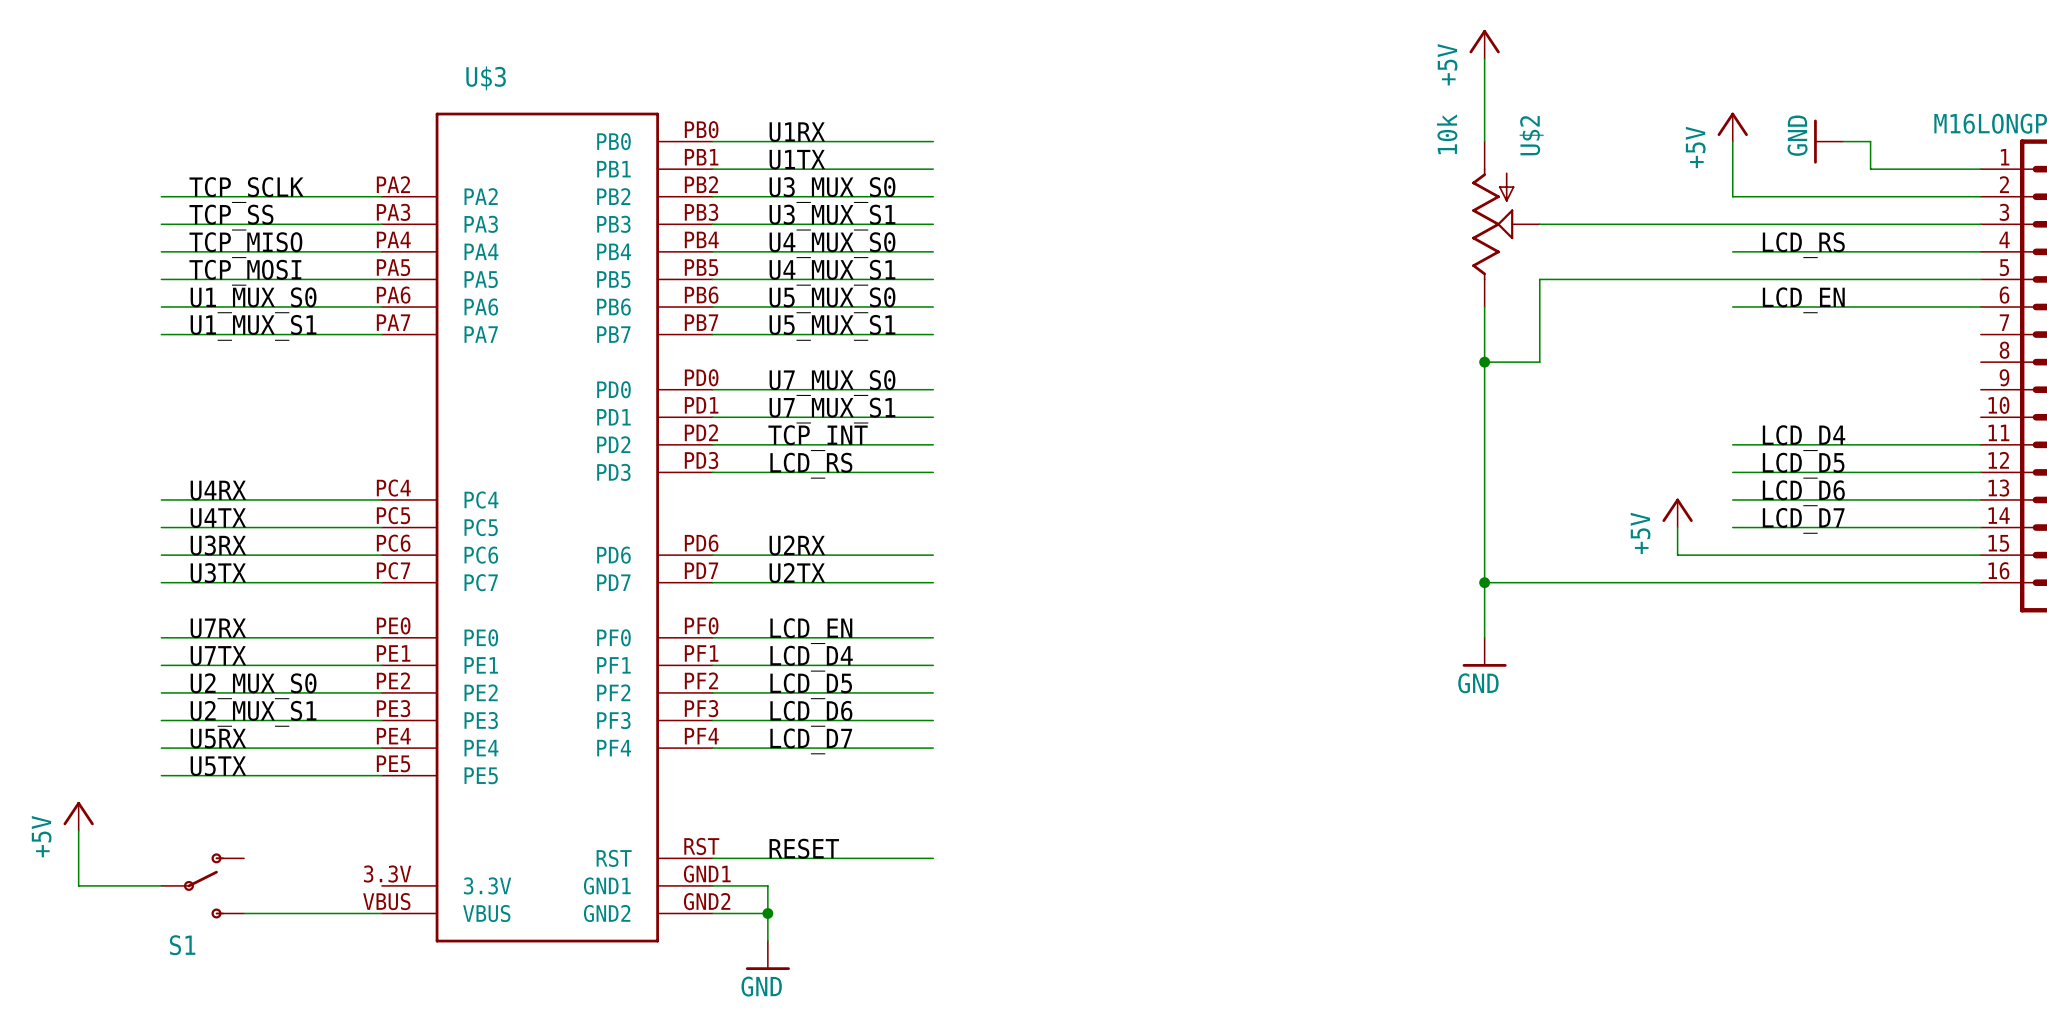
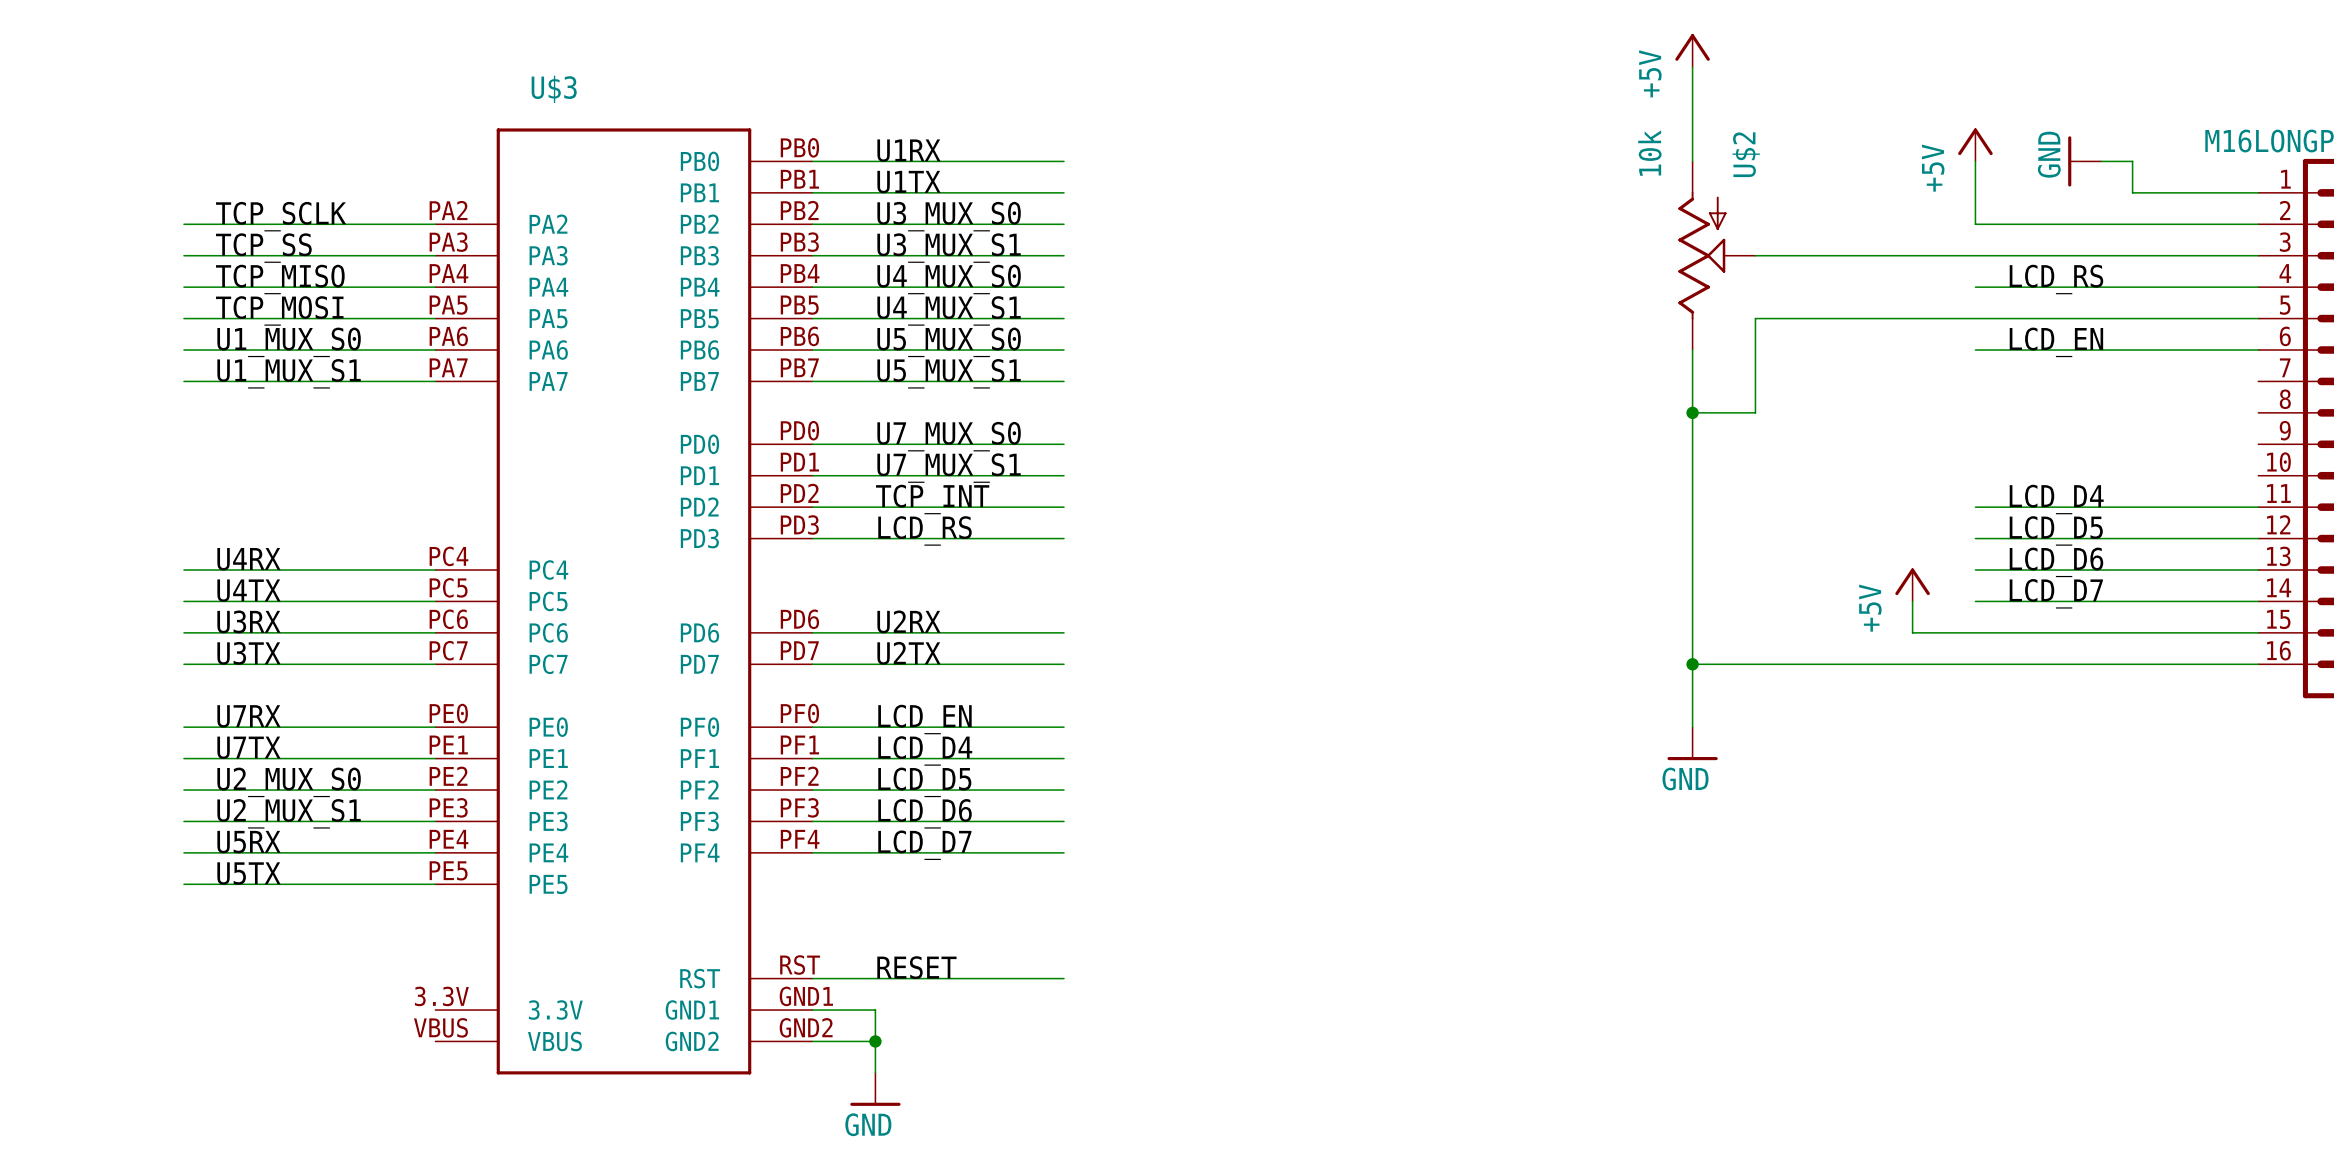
power symbol: +5V (78, 816) -> none
wire: (78, 830) (78, 885) (161, 885) -> none
S1: (202, 885) -> none
wire: (244, 913) (381, 913) -> none

